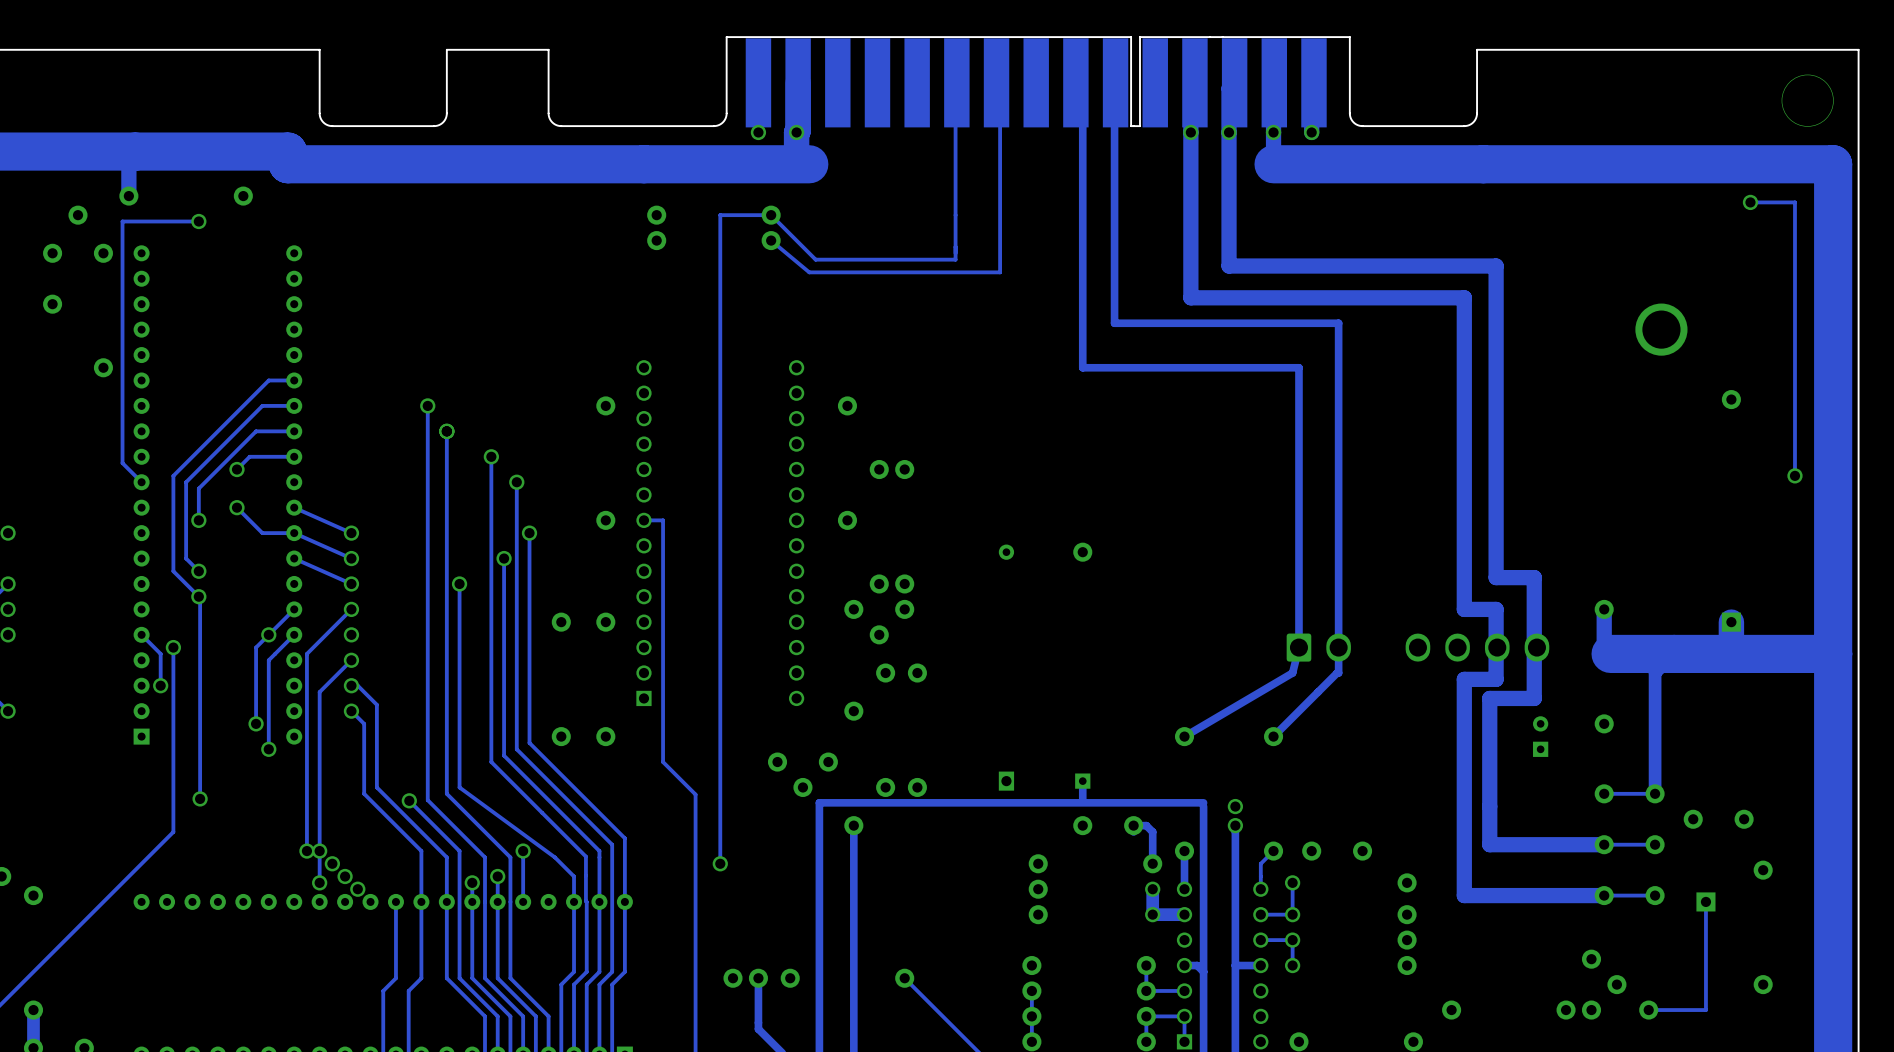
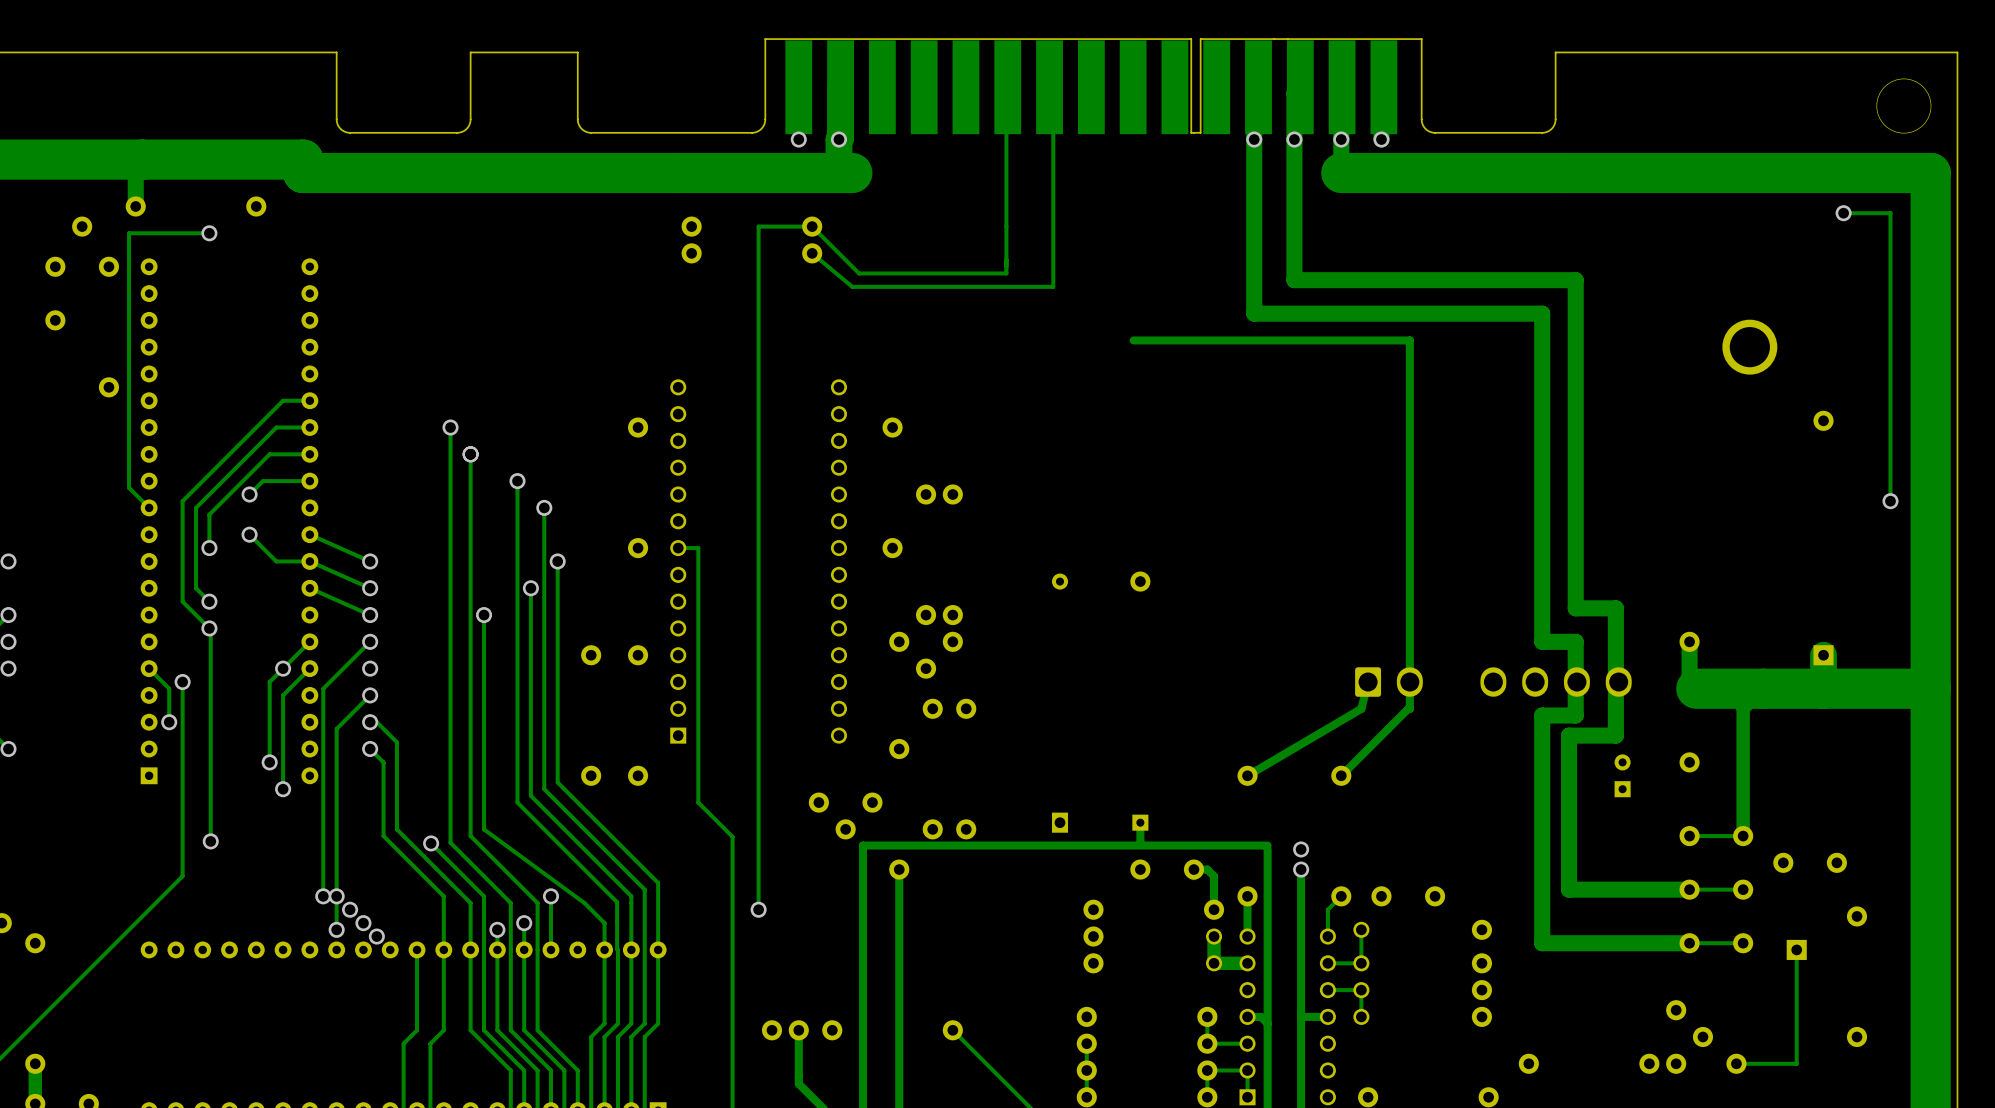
track: (1115, 82) (1114, 323) -> (1133, 340) (1173, 340)
track: (1076, 83) (1082, 89) (1082, 367) (1298, 367) (1298, 647) -> none

